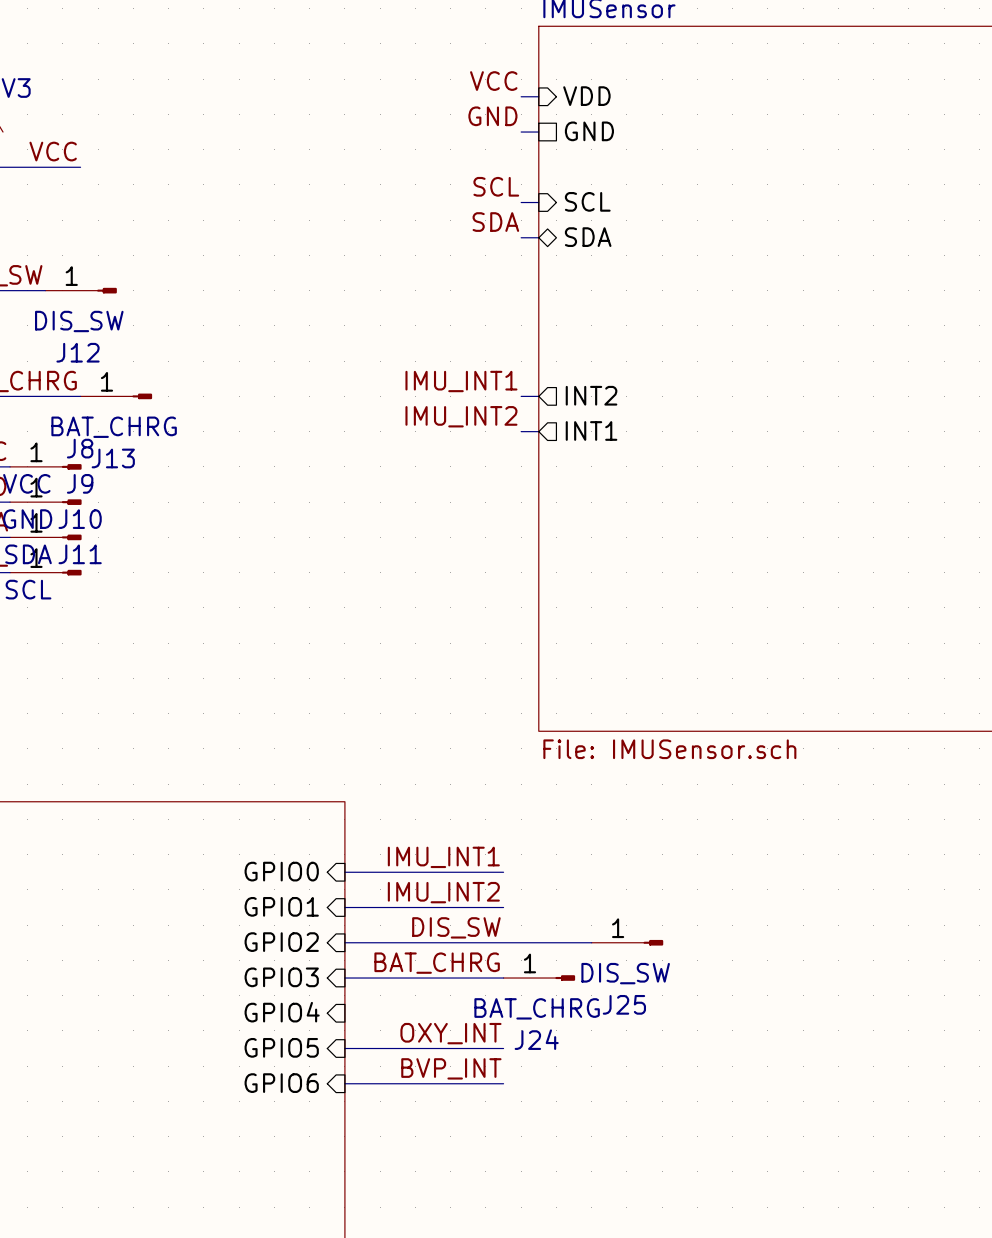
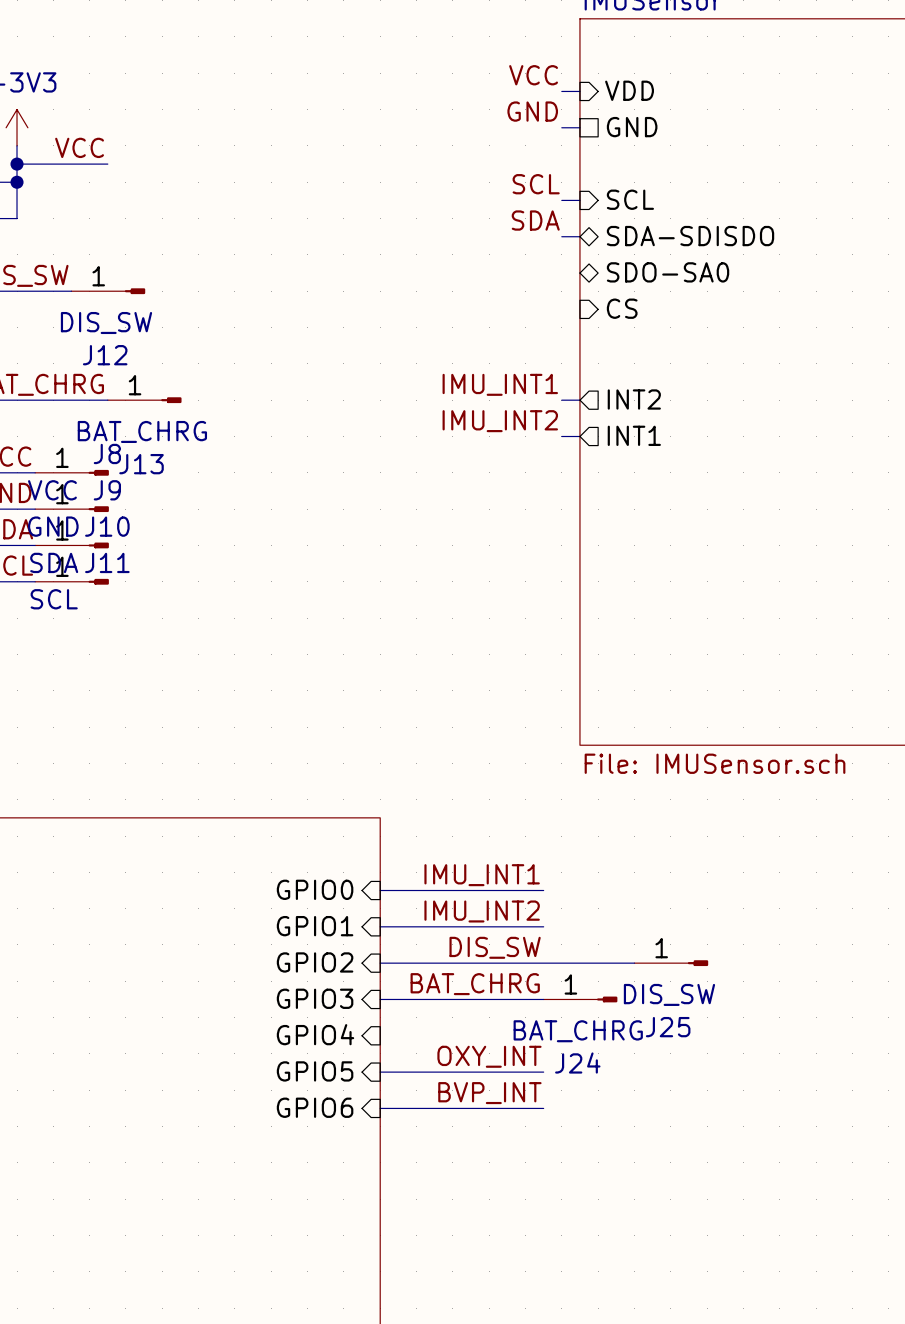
sheet pin: SDA (588, 237) -> SDA-SDISDO (690, 236)
sheet pin: none -> SDO-SA0 (668, 272)
sheet pin: none -> CS (622, 308)

